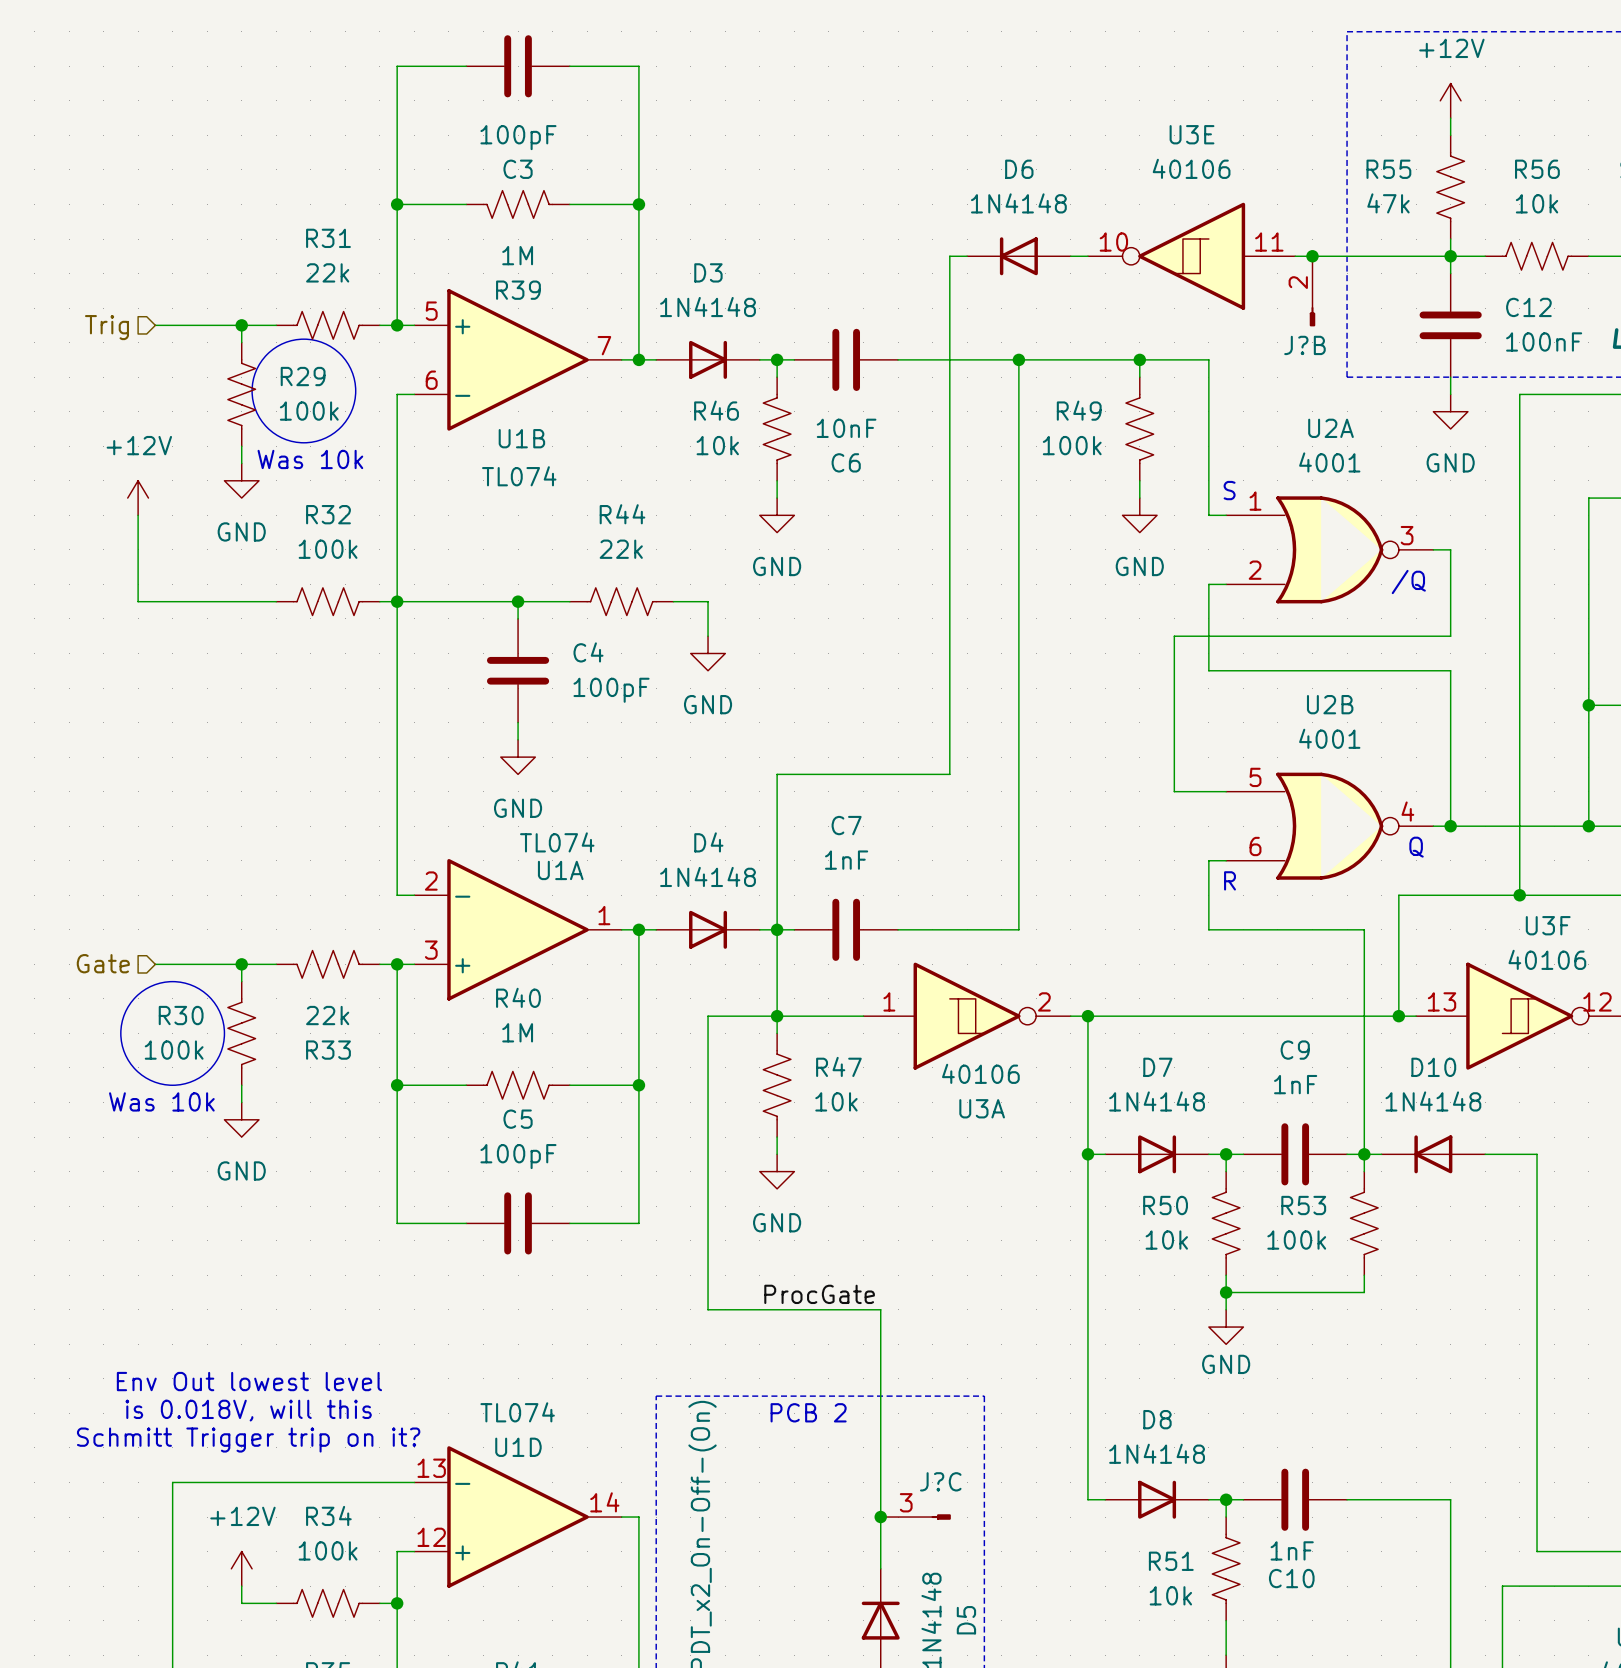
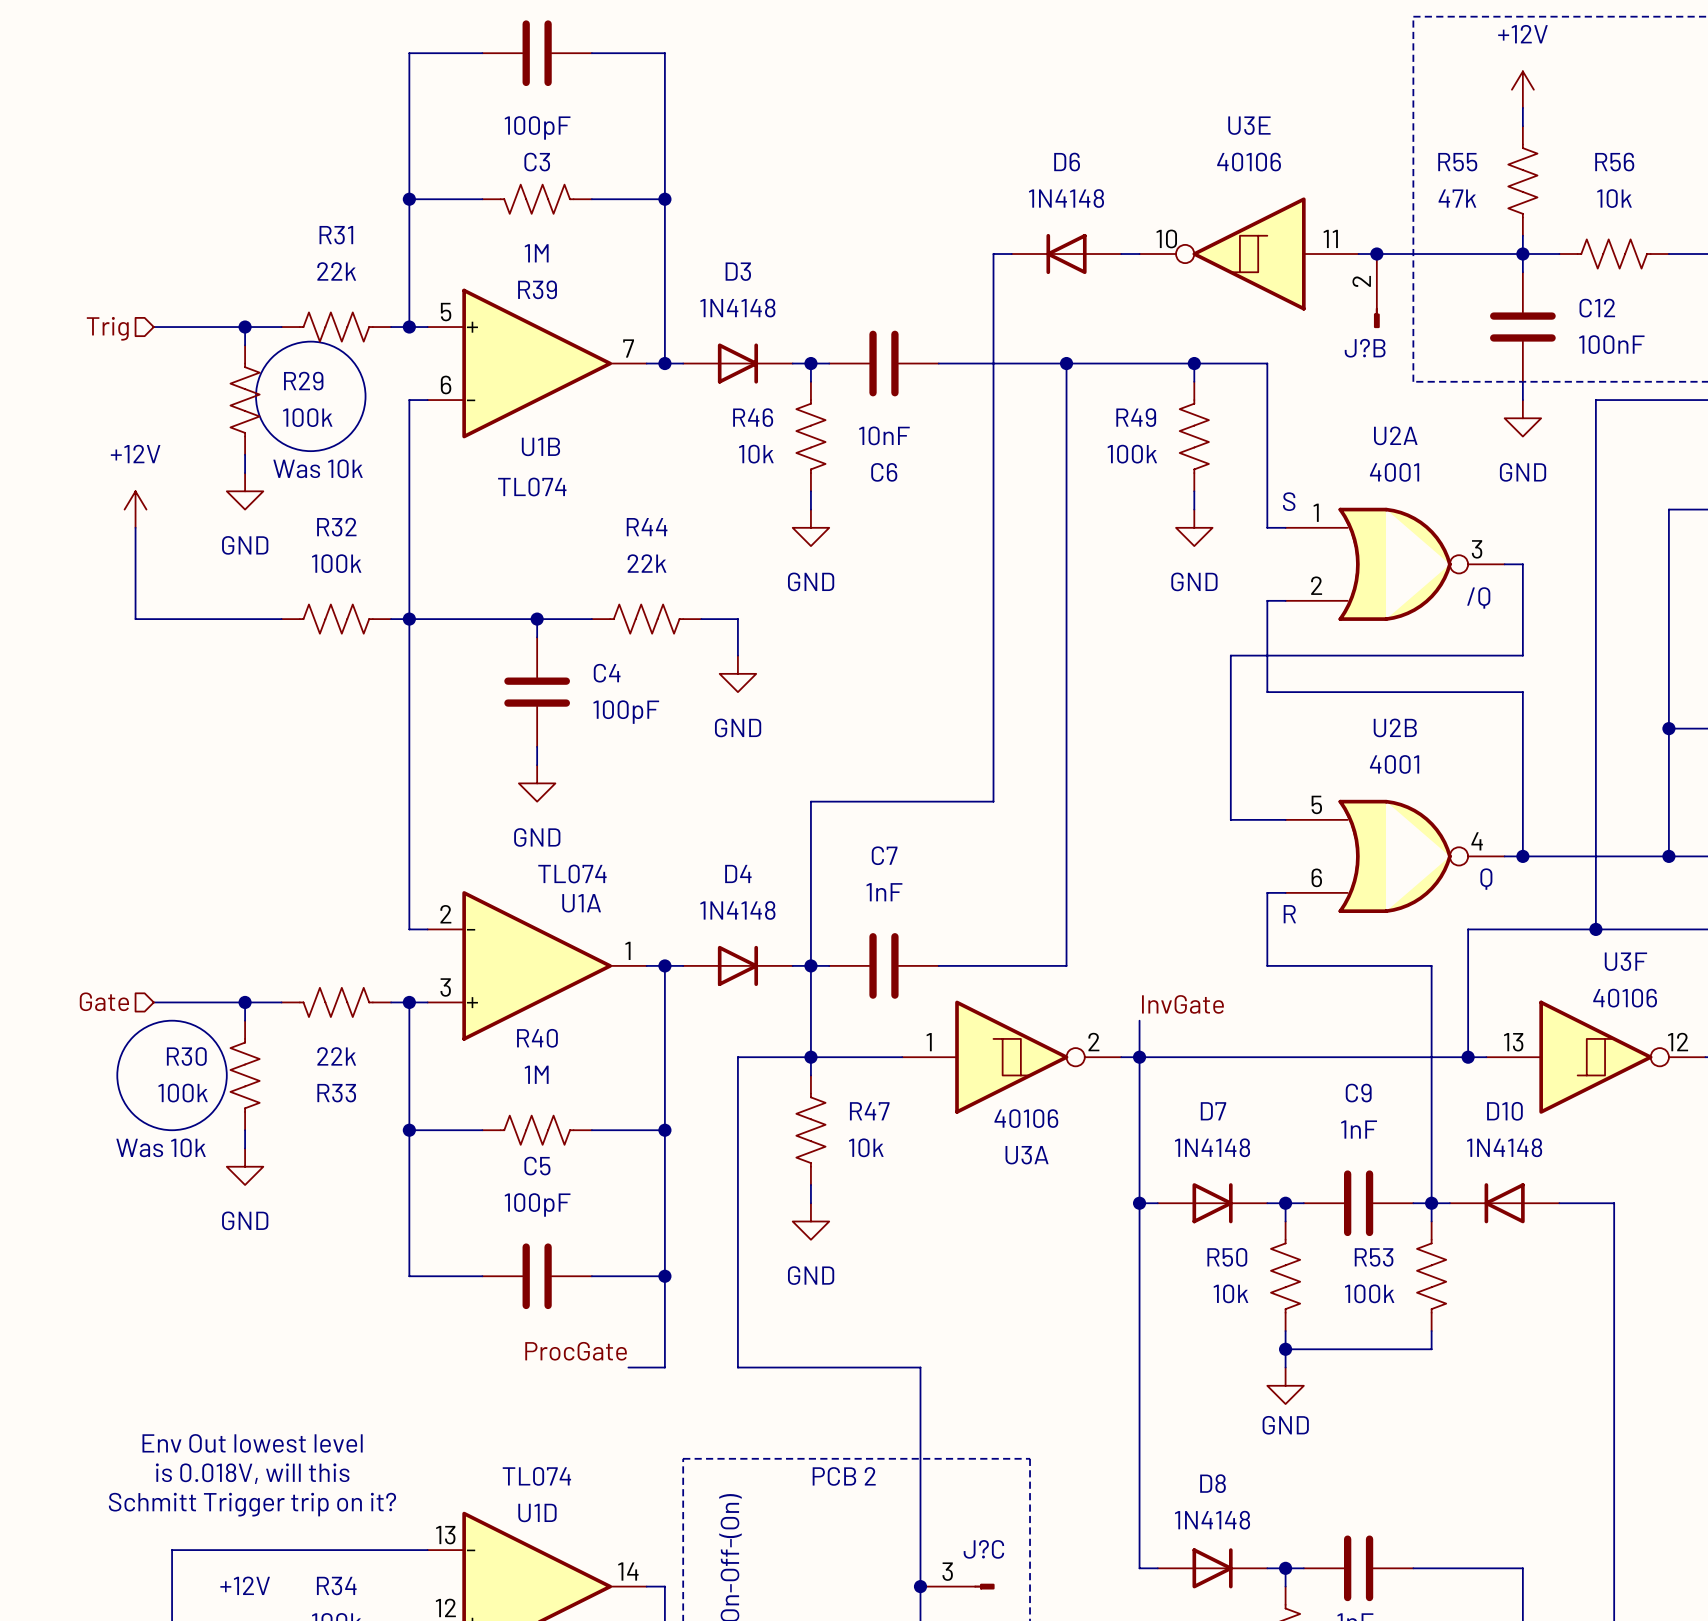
label: none -> InvGate (1182, 1004)
wire: none -> (1139, 1020) (1139, 1057)
wire: none -> (664, 1276) (664, 1367) (628, 1367)
junction: none -> (664, 1276)
label position: ProcGate (819, 1294) -> ProcGate (576, 1351)

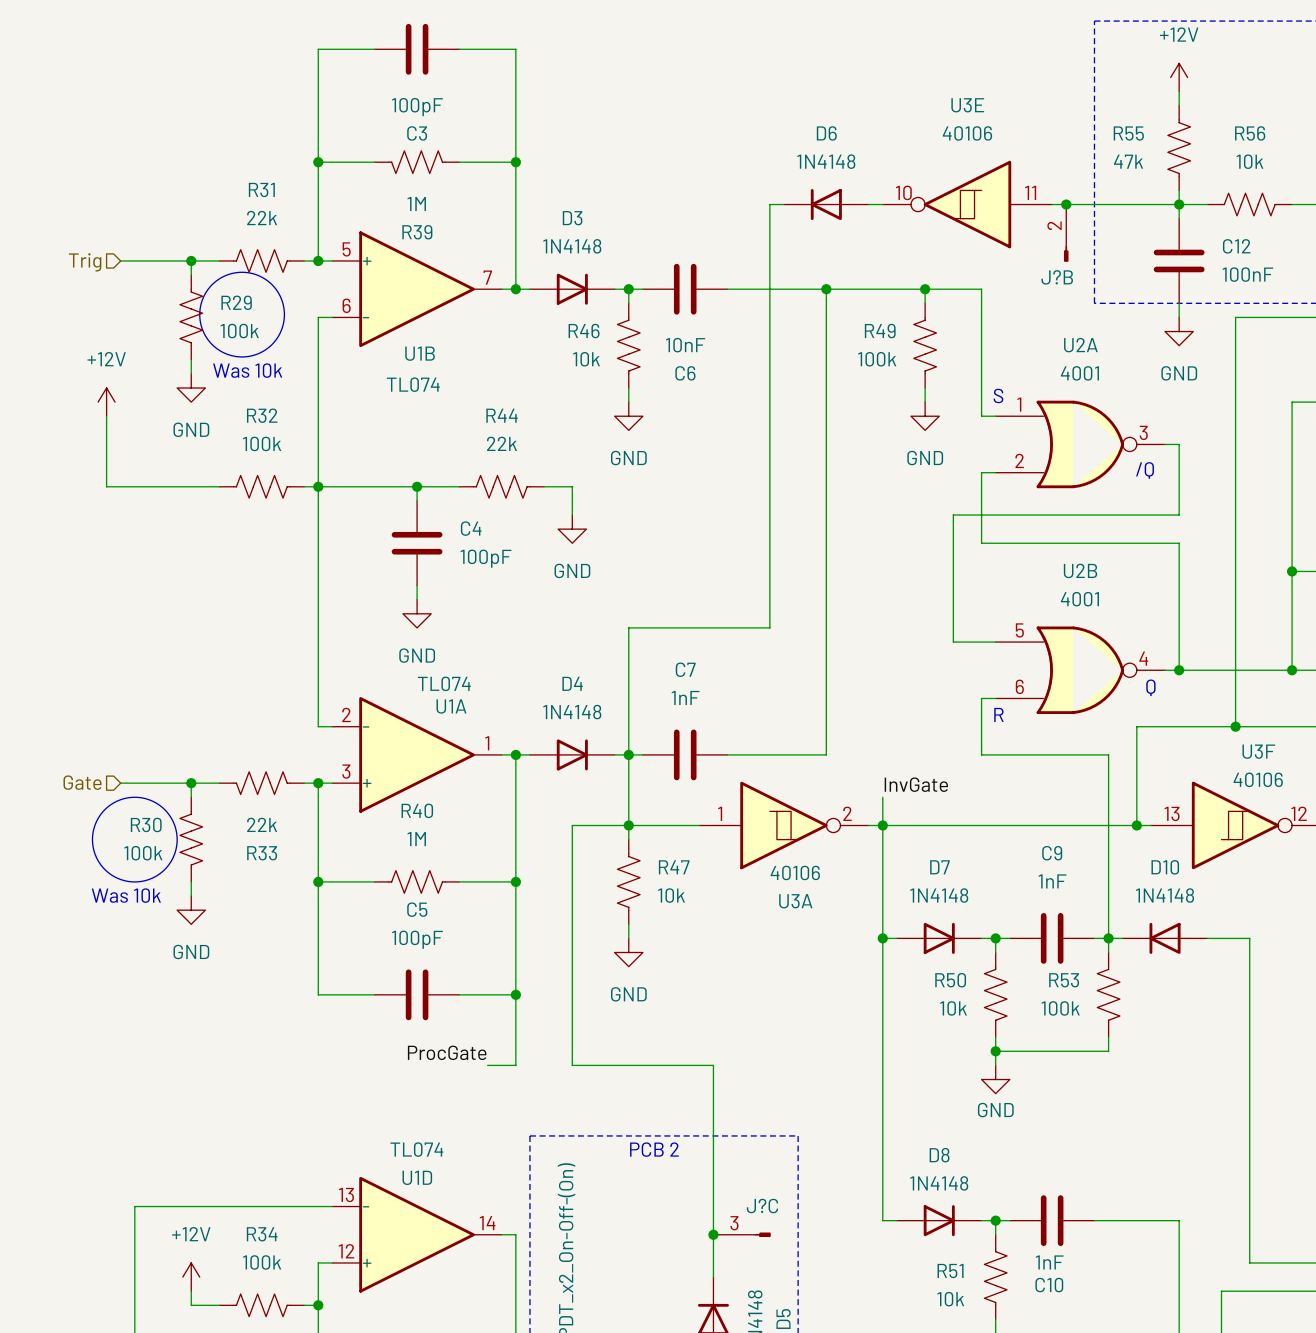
text: Env Out lowest level (252, 1443) -> none
text: is 0.018V, will this (252, 1473) -> none
text: Schmitt Trigger trip on it? (252, 1504) -> none

